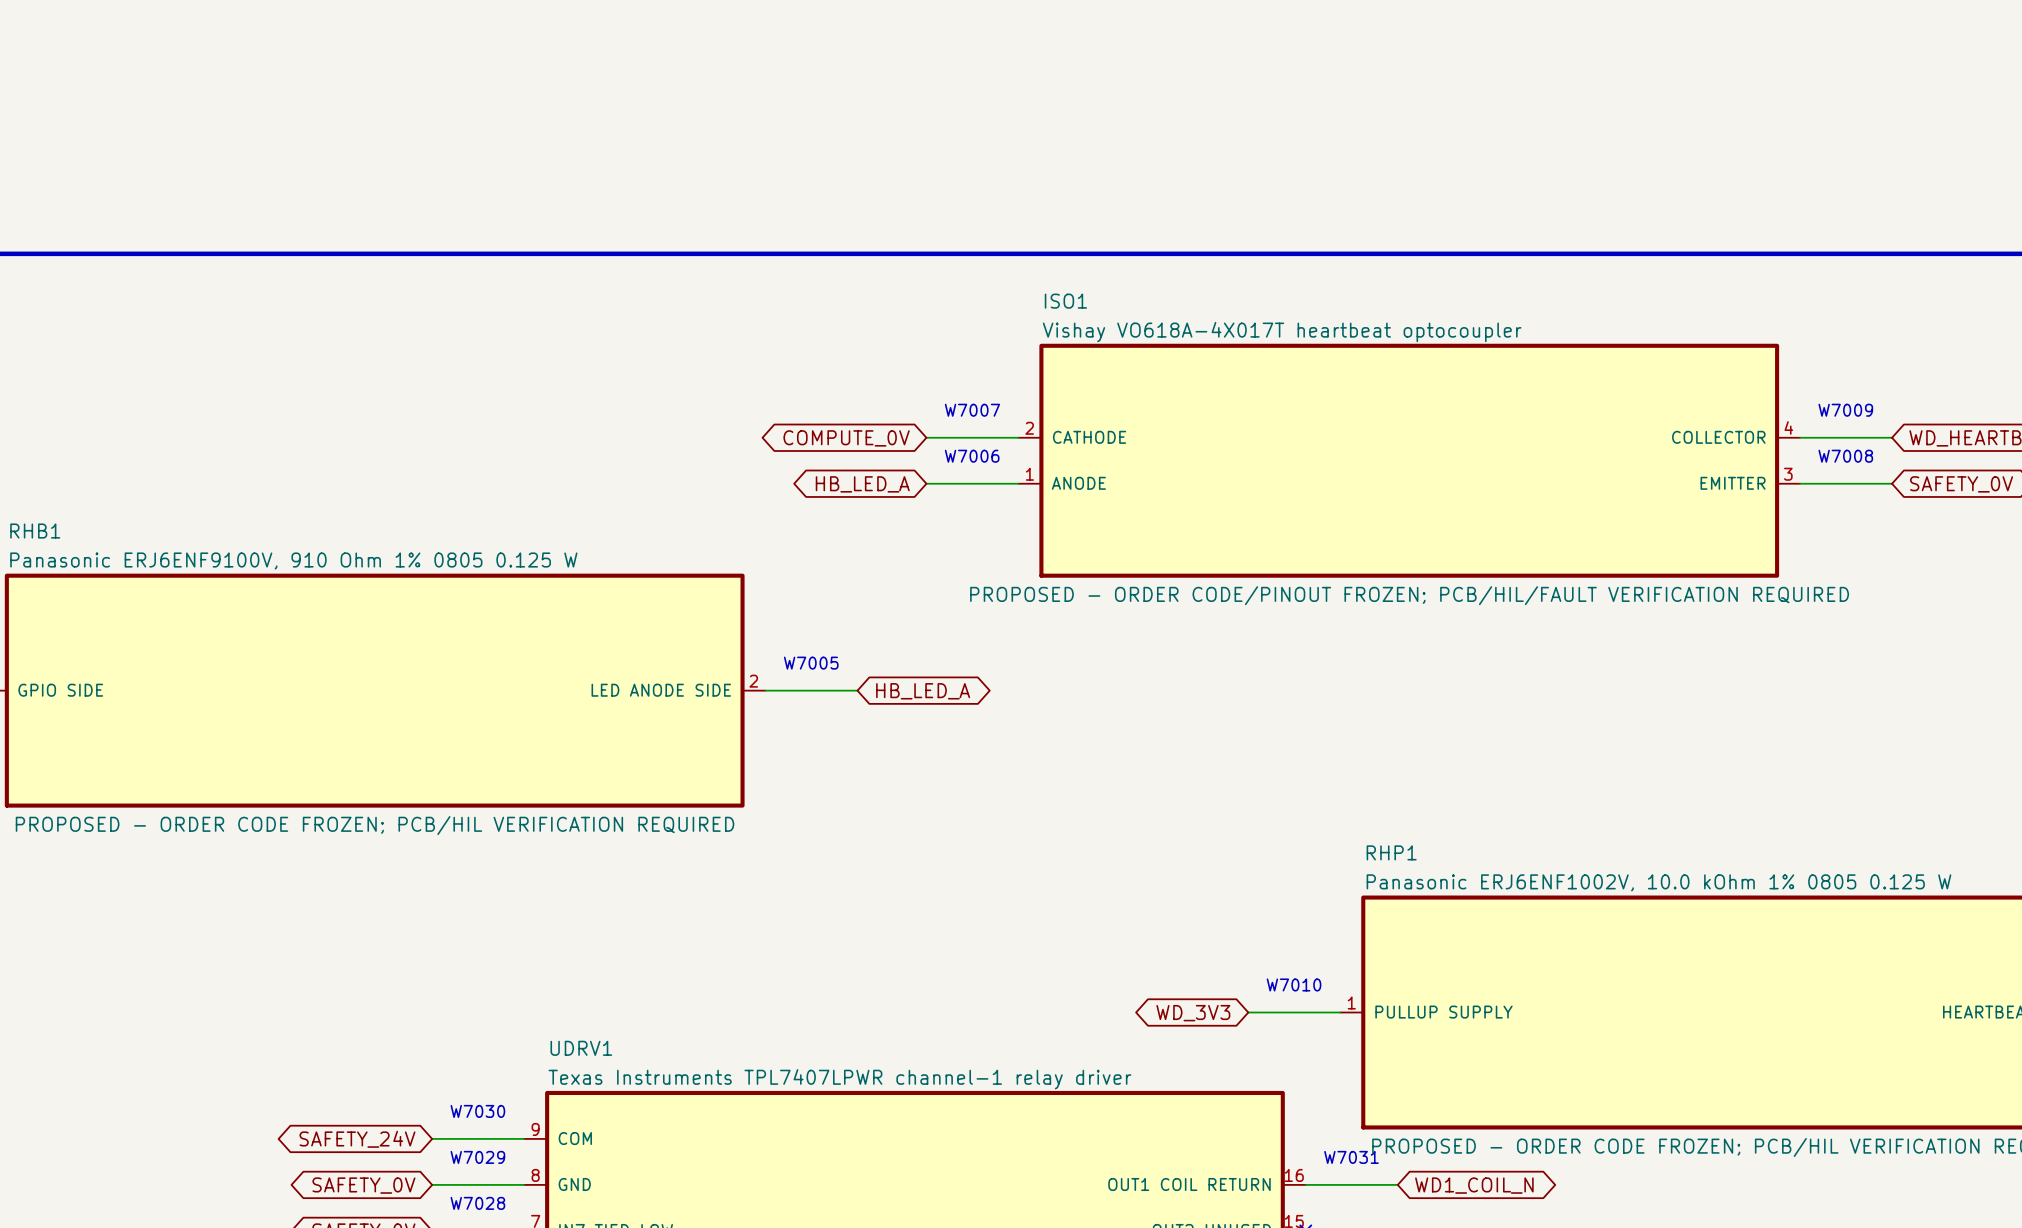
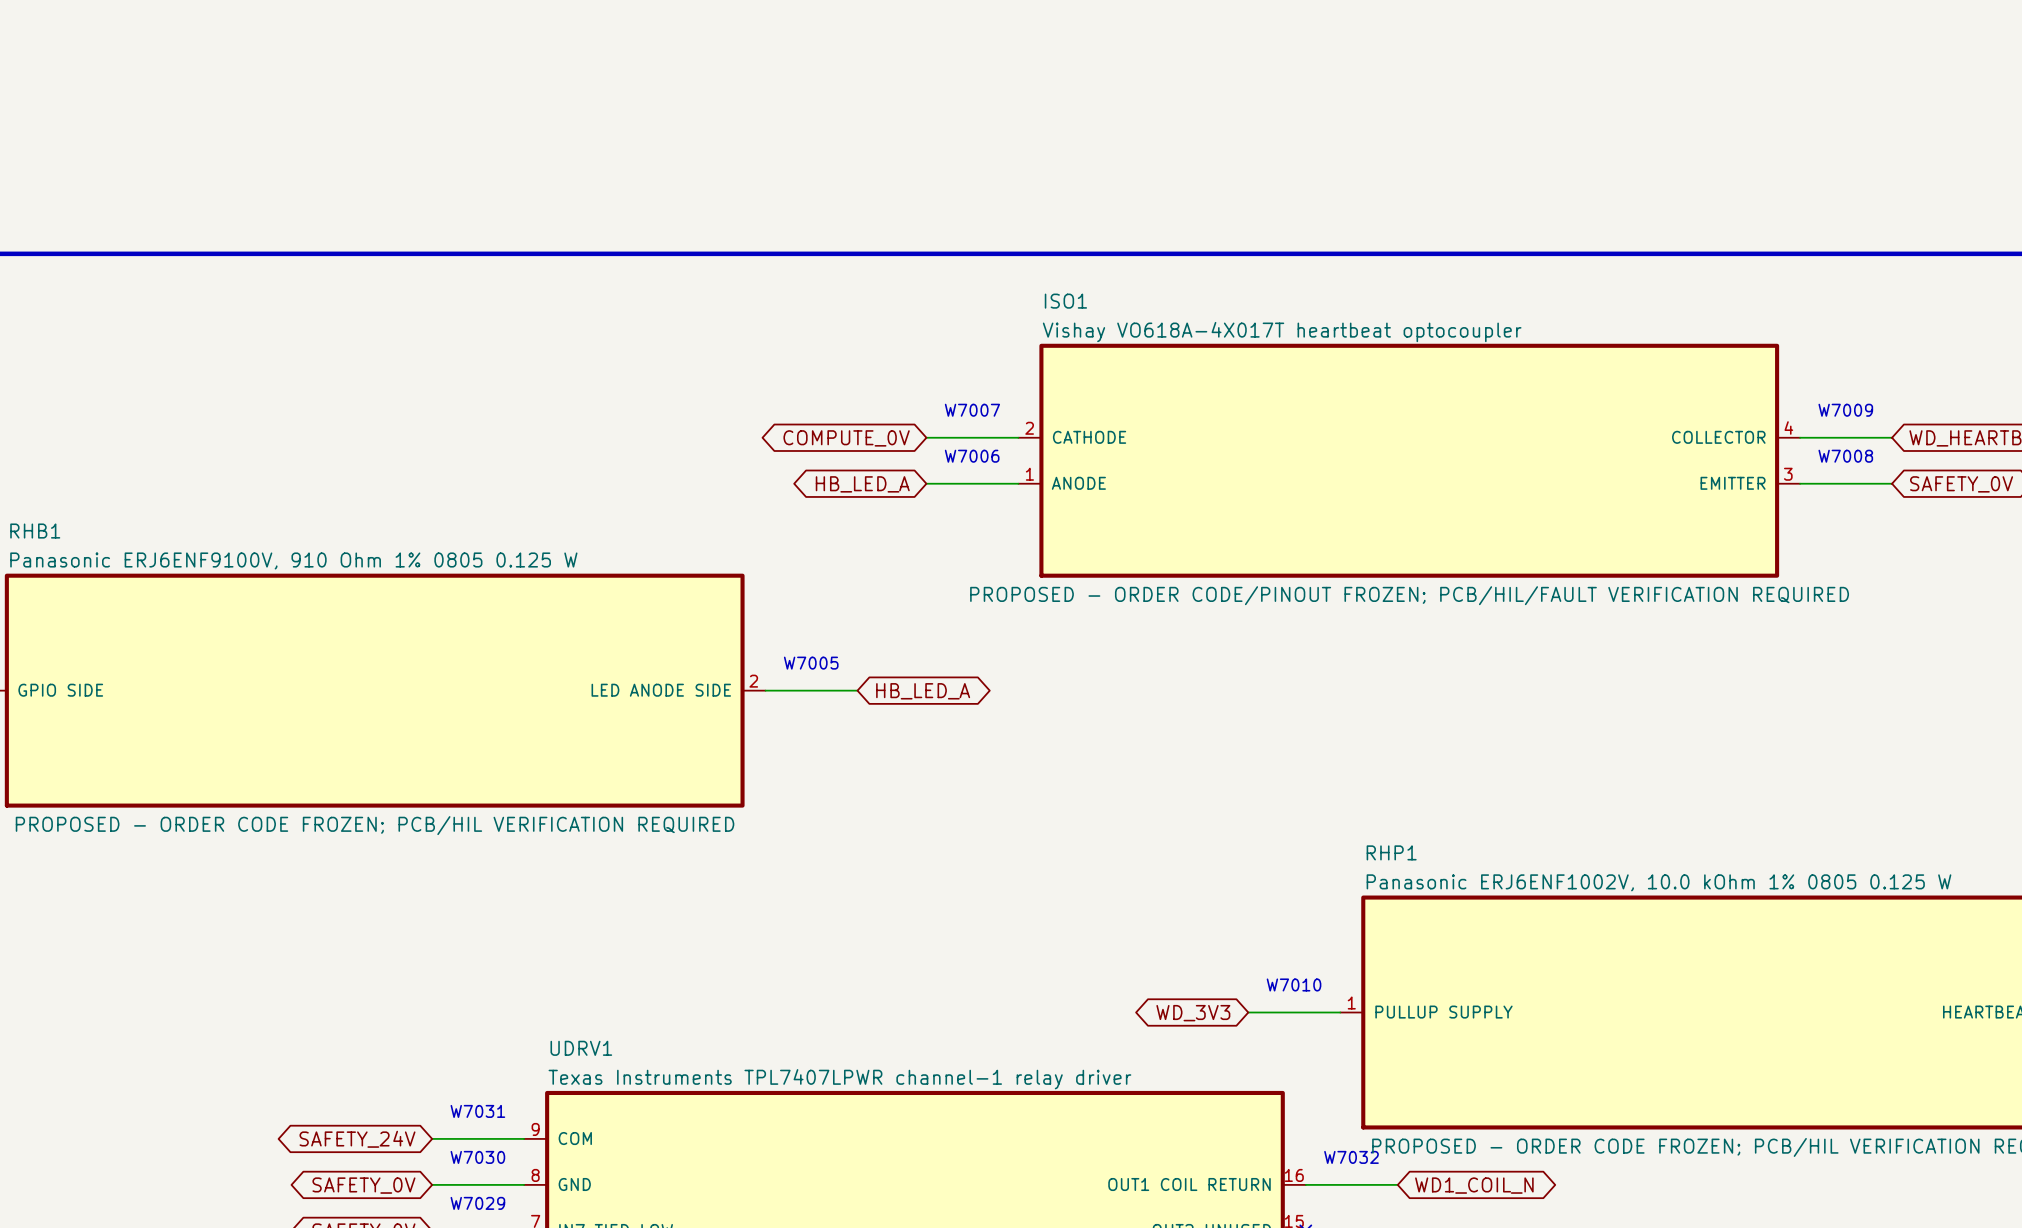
text: W7030 (477, 1111) -> W7031 (477, 1111)
text: W7029 (477, 1157) -> W7030 (477, 1157)
text: W7031 (1351, 1157) -> W7032 (1351, 1157)
text: W7028 (477, 1203) -> W7029 (477, 1203)

